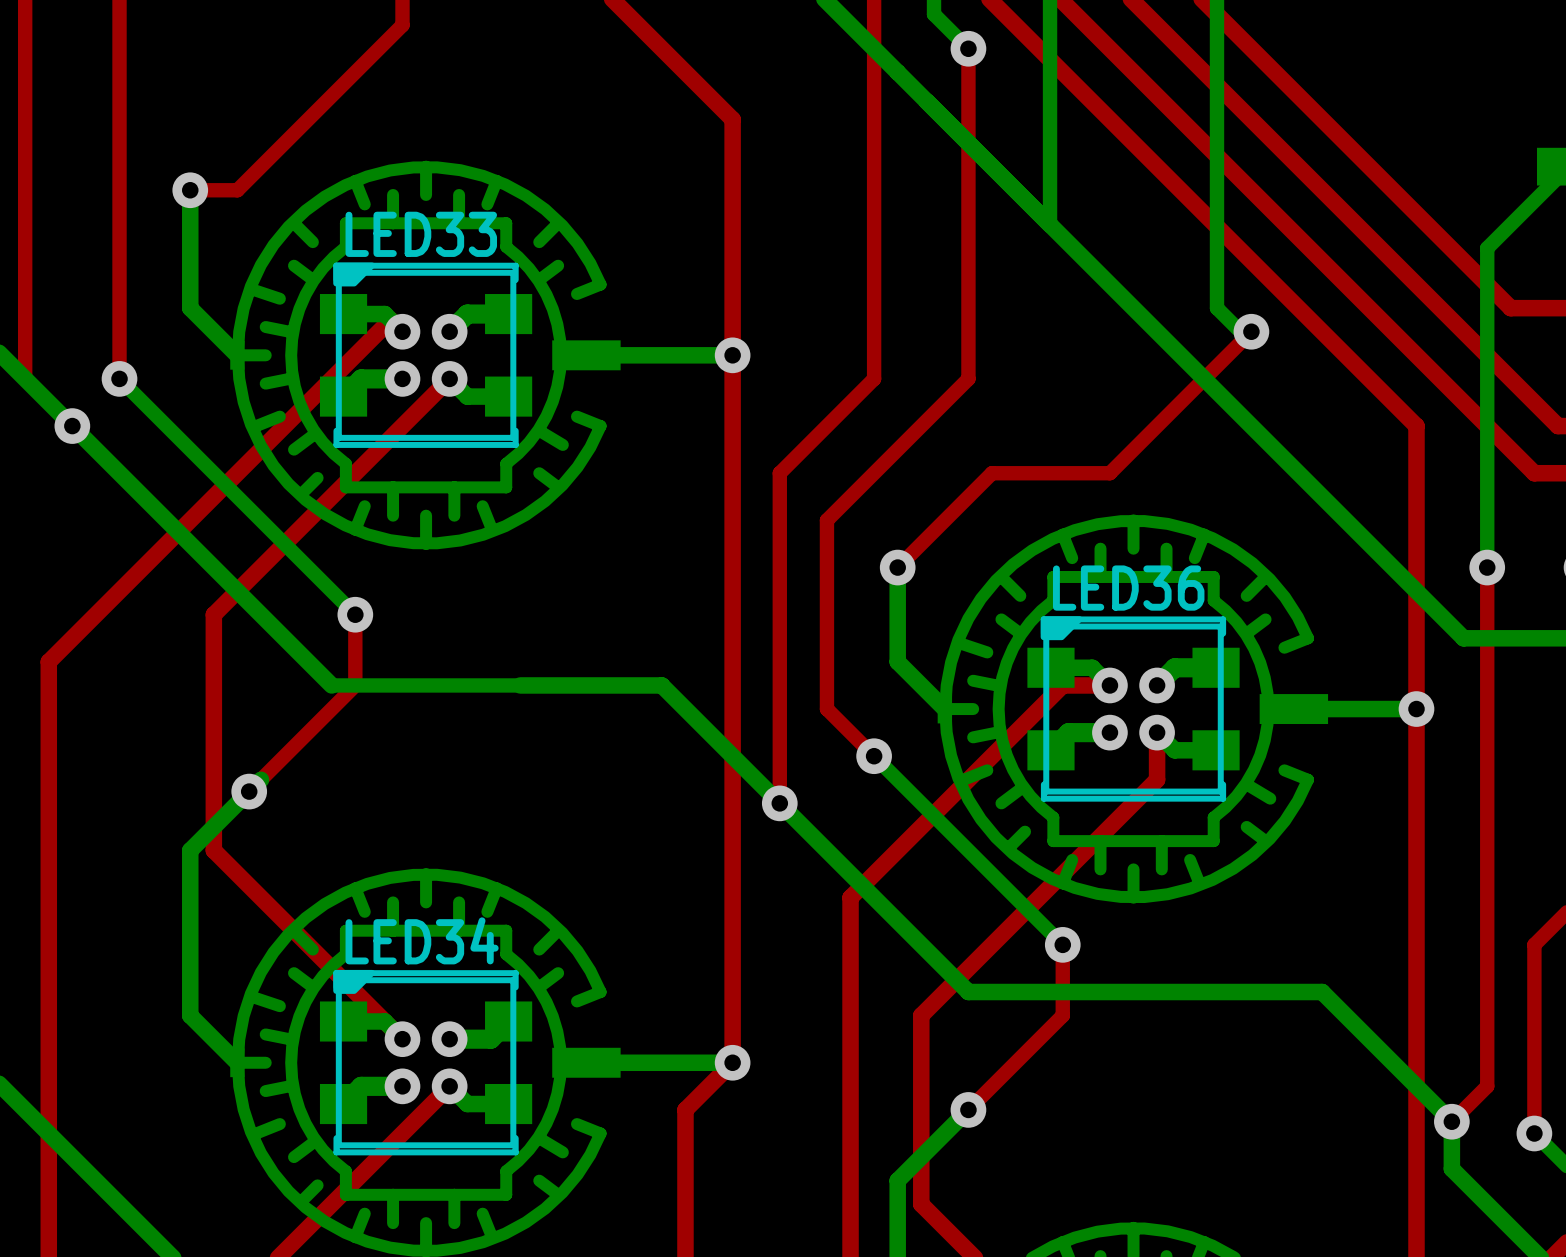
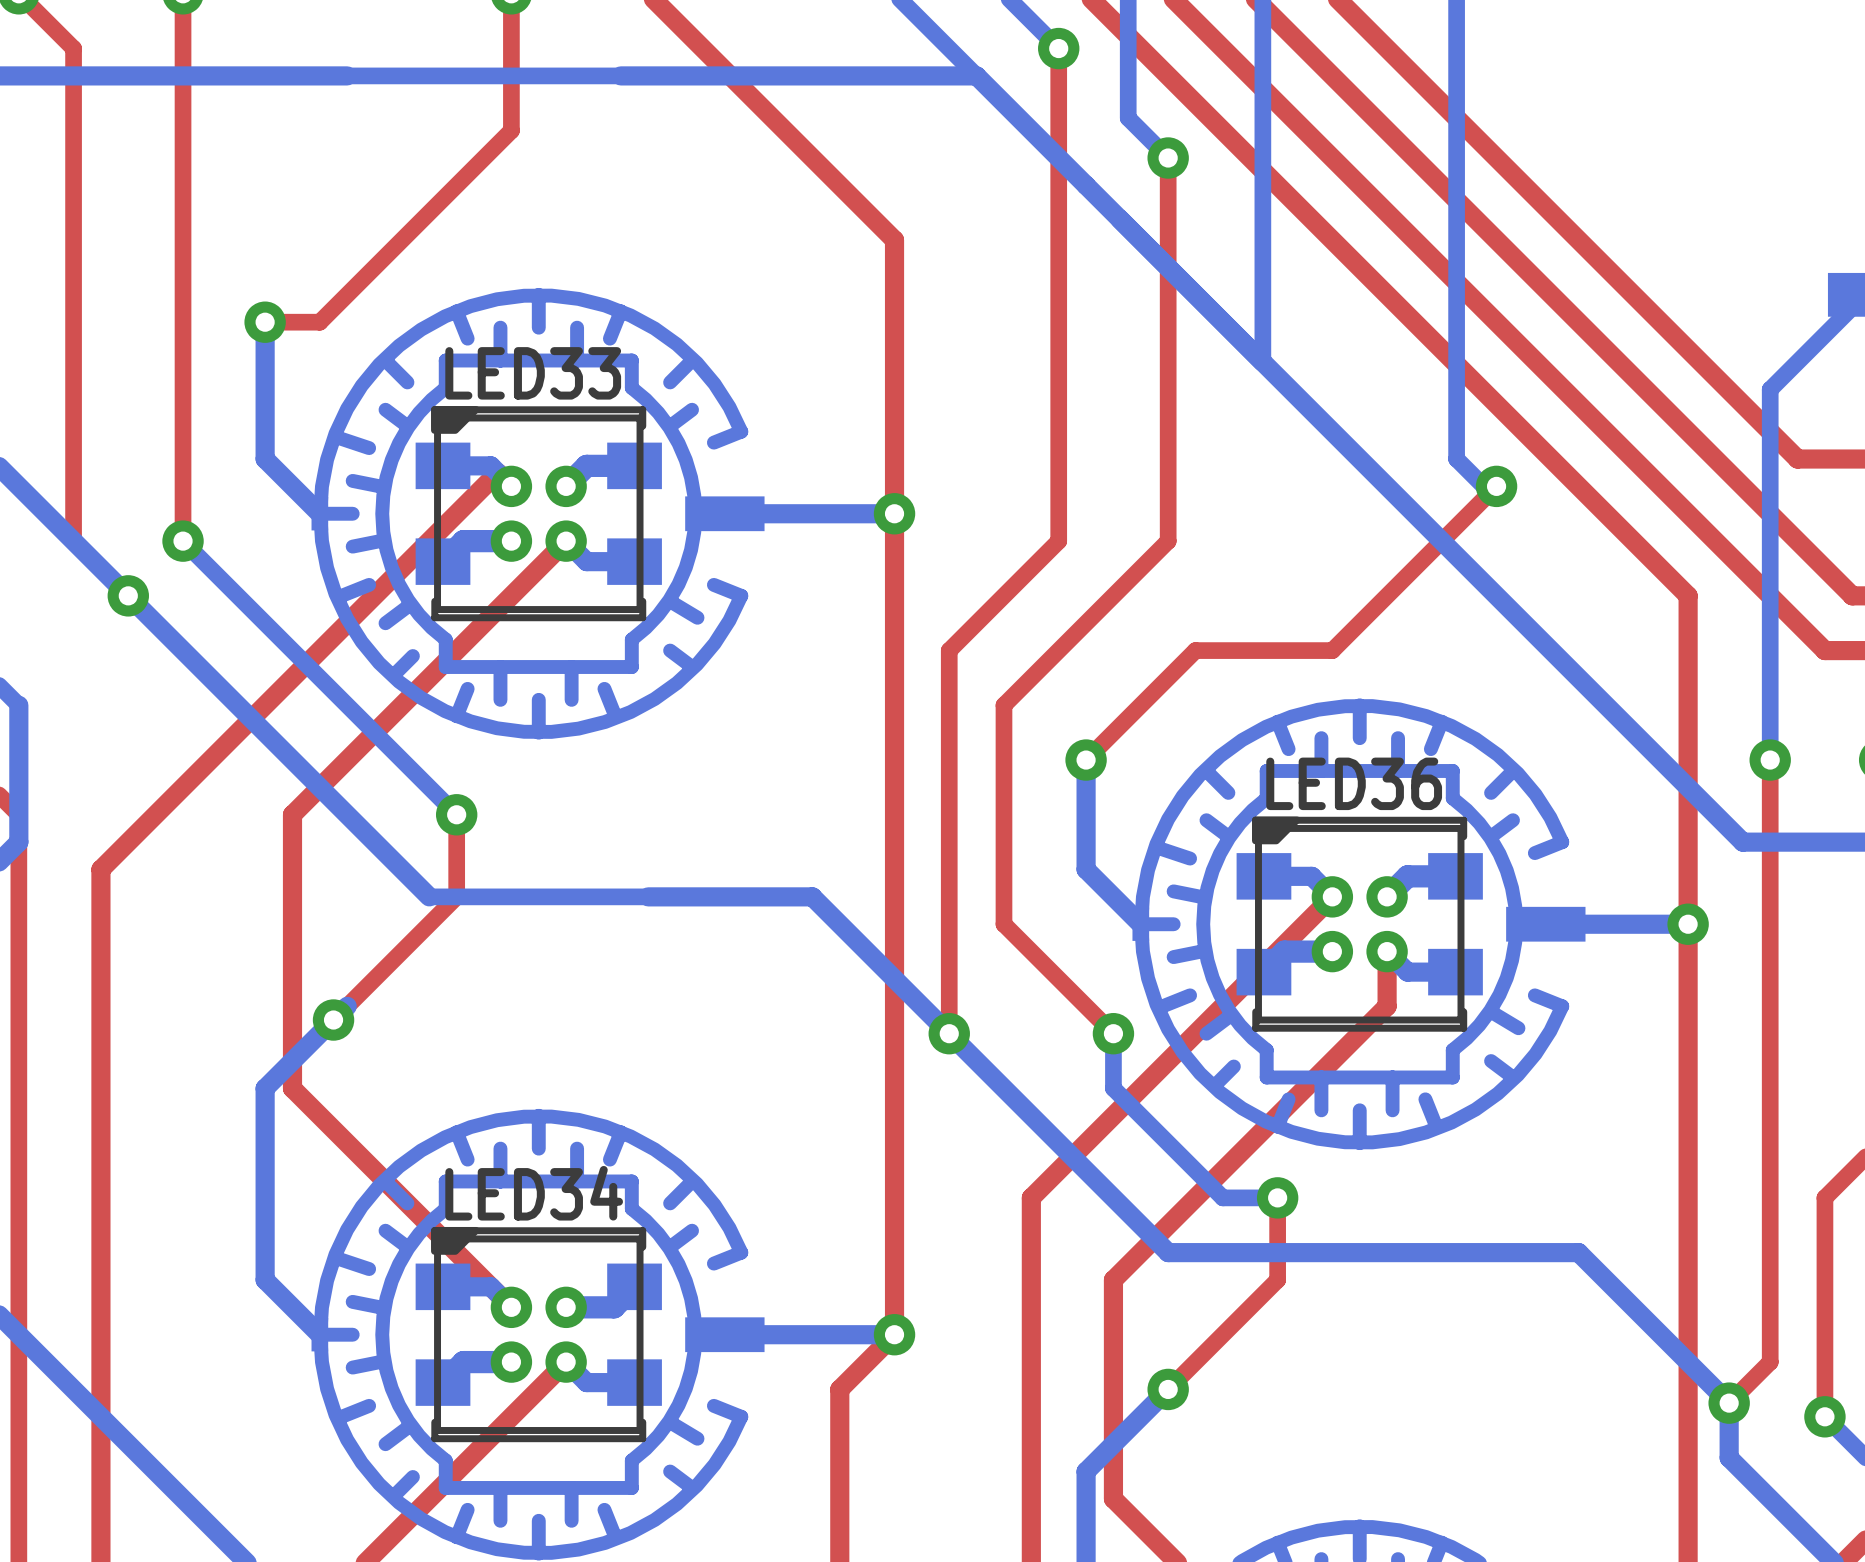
top track: (1109, 685) (1062, 685) (850, 897) (850, 944) -> (1332, 896) (1031, 1197)
bottom track: (874, 756) (1062, 944) -> (1113, 1033) (1113, 1088) (1222, 1197) (1277, 1197)
top track: none -> (1058, 978) (1113, 1033)
via position: (874, 756) -> (1113, 1033)

